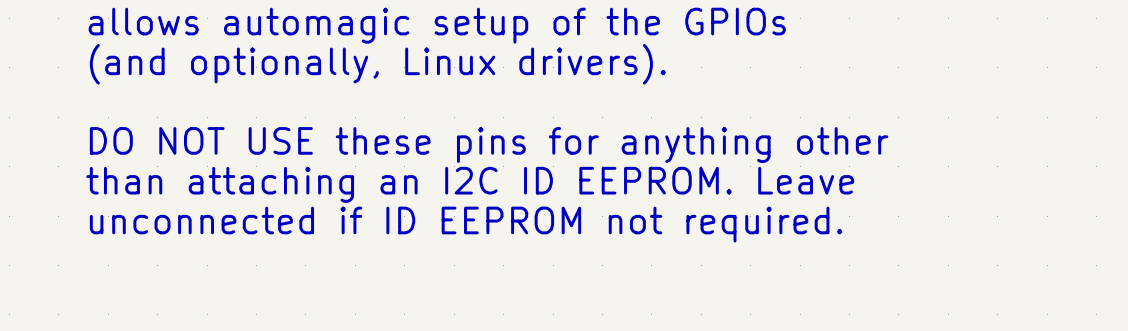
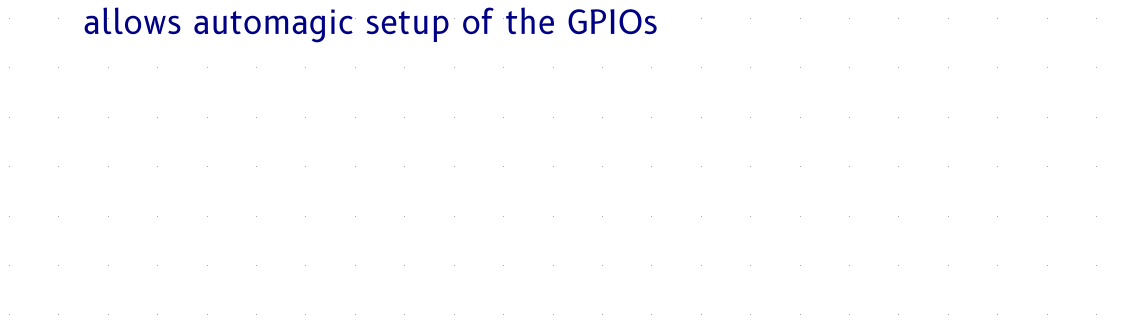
text: (and optionally, Linux drivers). (377, 64) -> none
text: DO NOT USE these pins for anything other (489, 145) -> none
text: than attaching an I2C ID EEPROM. Leave (470, 184) -> none
text: unconnected if ID EEPROM not required. (466, 224) -> none

